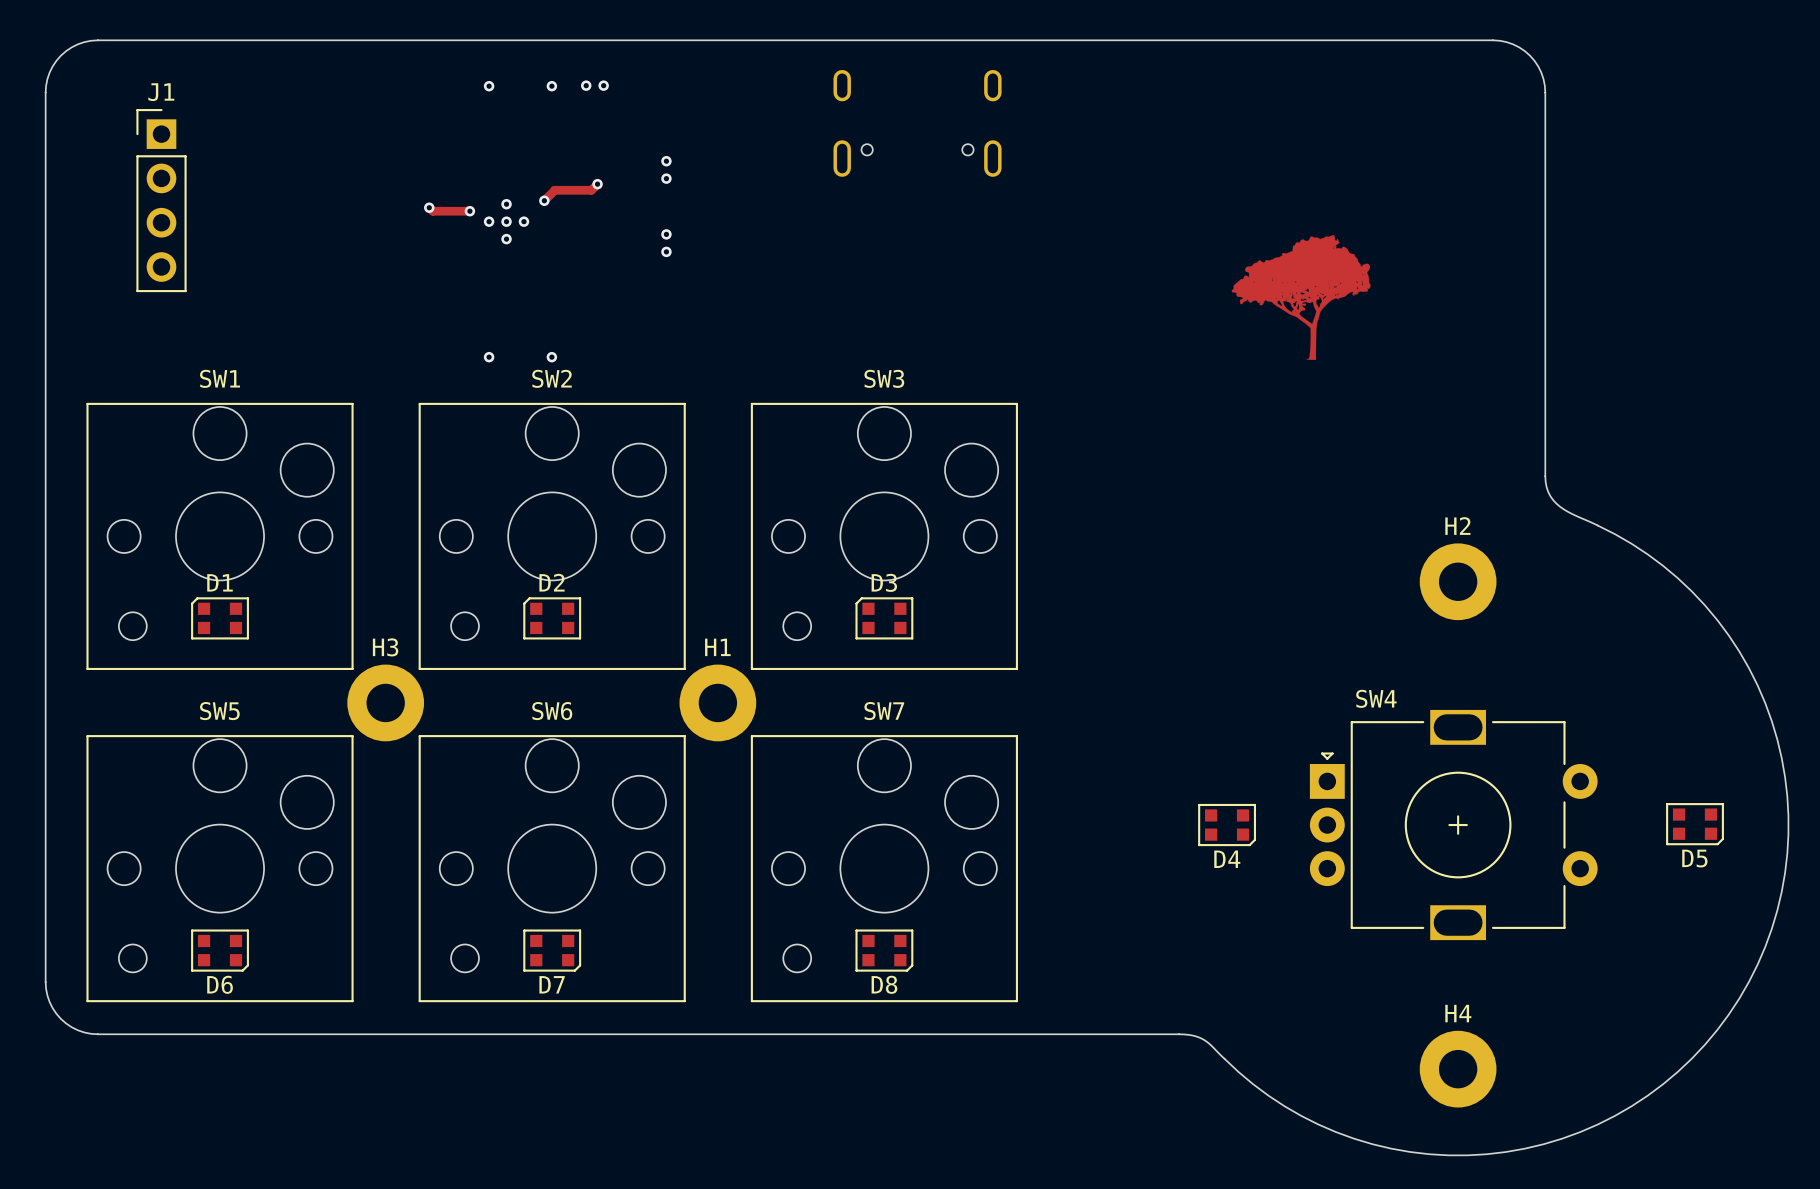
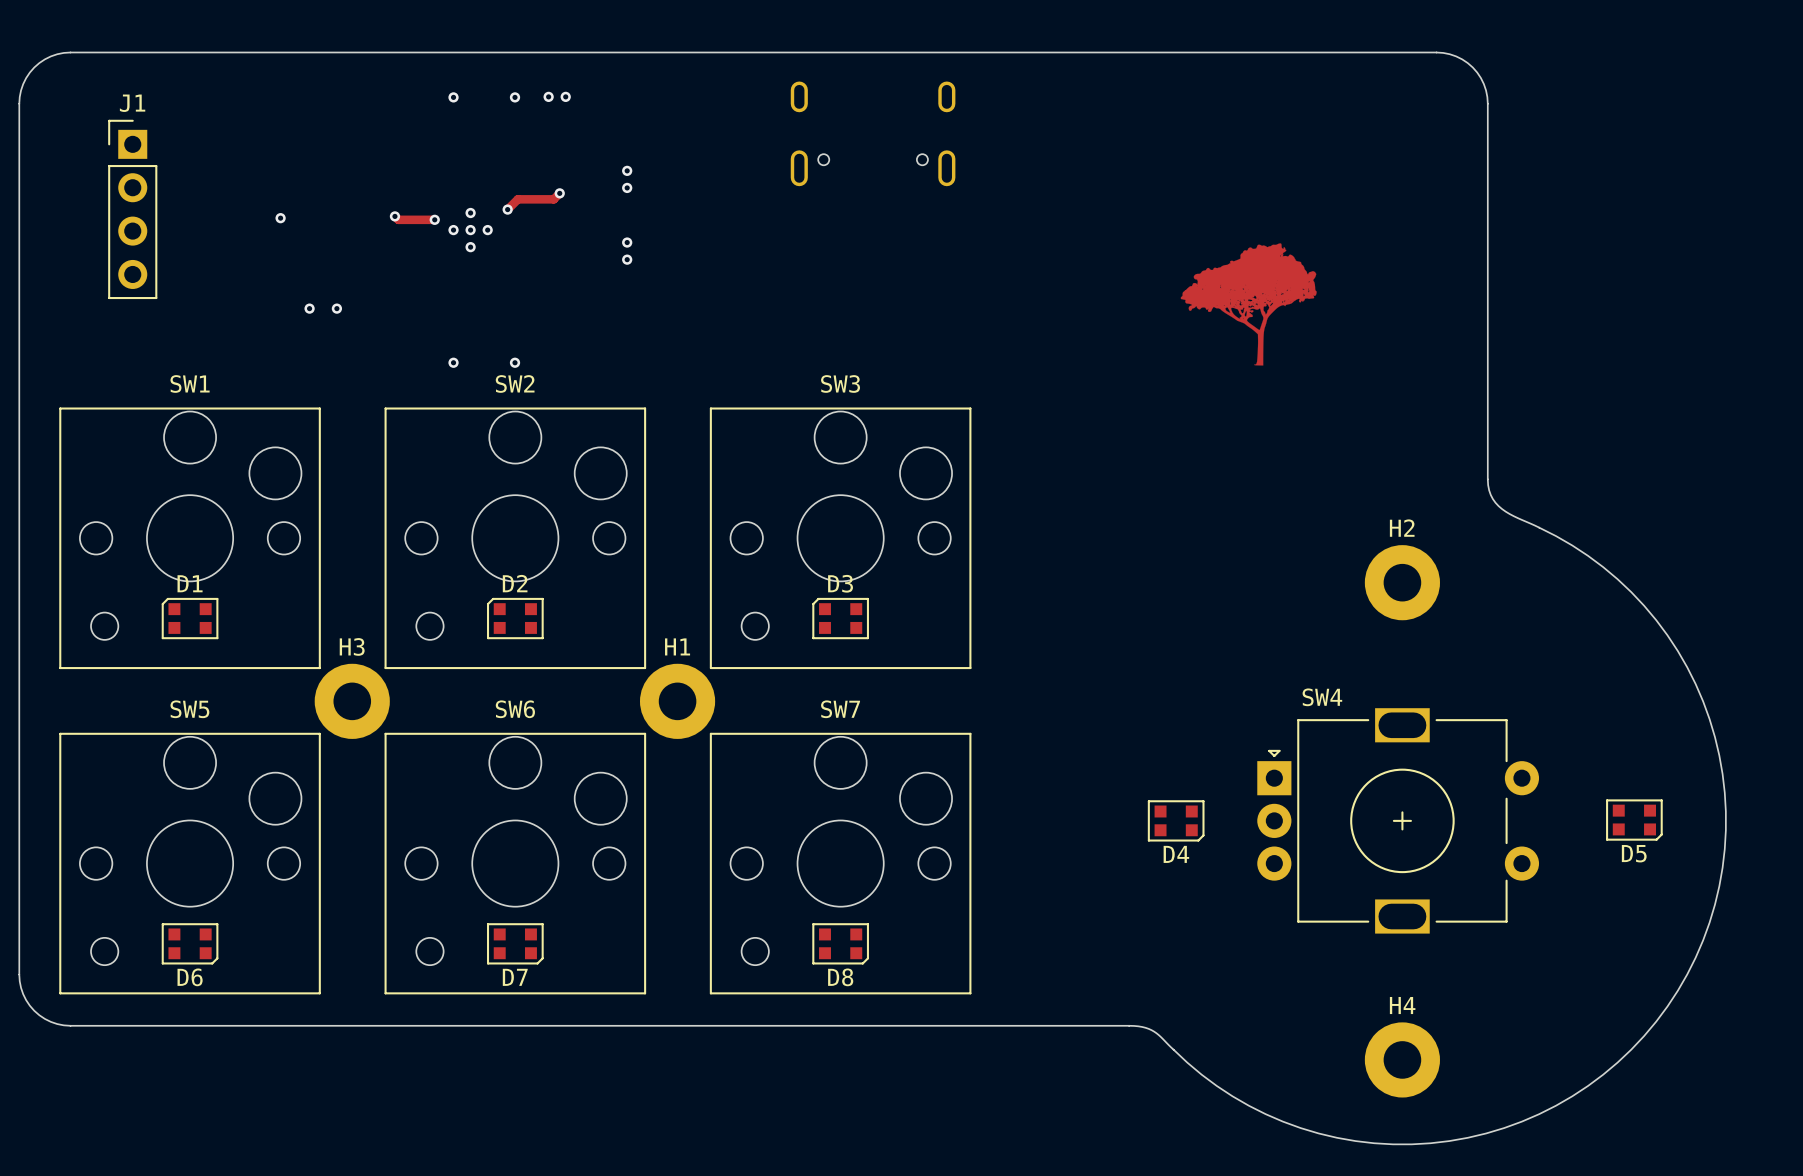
via: none -> (280, 218)
via: none -> (309, 308)
via: none -> (336, 308)

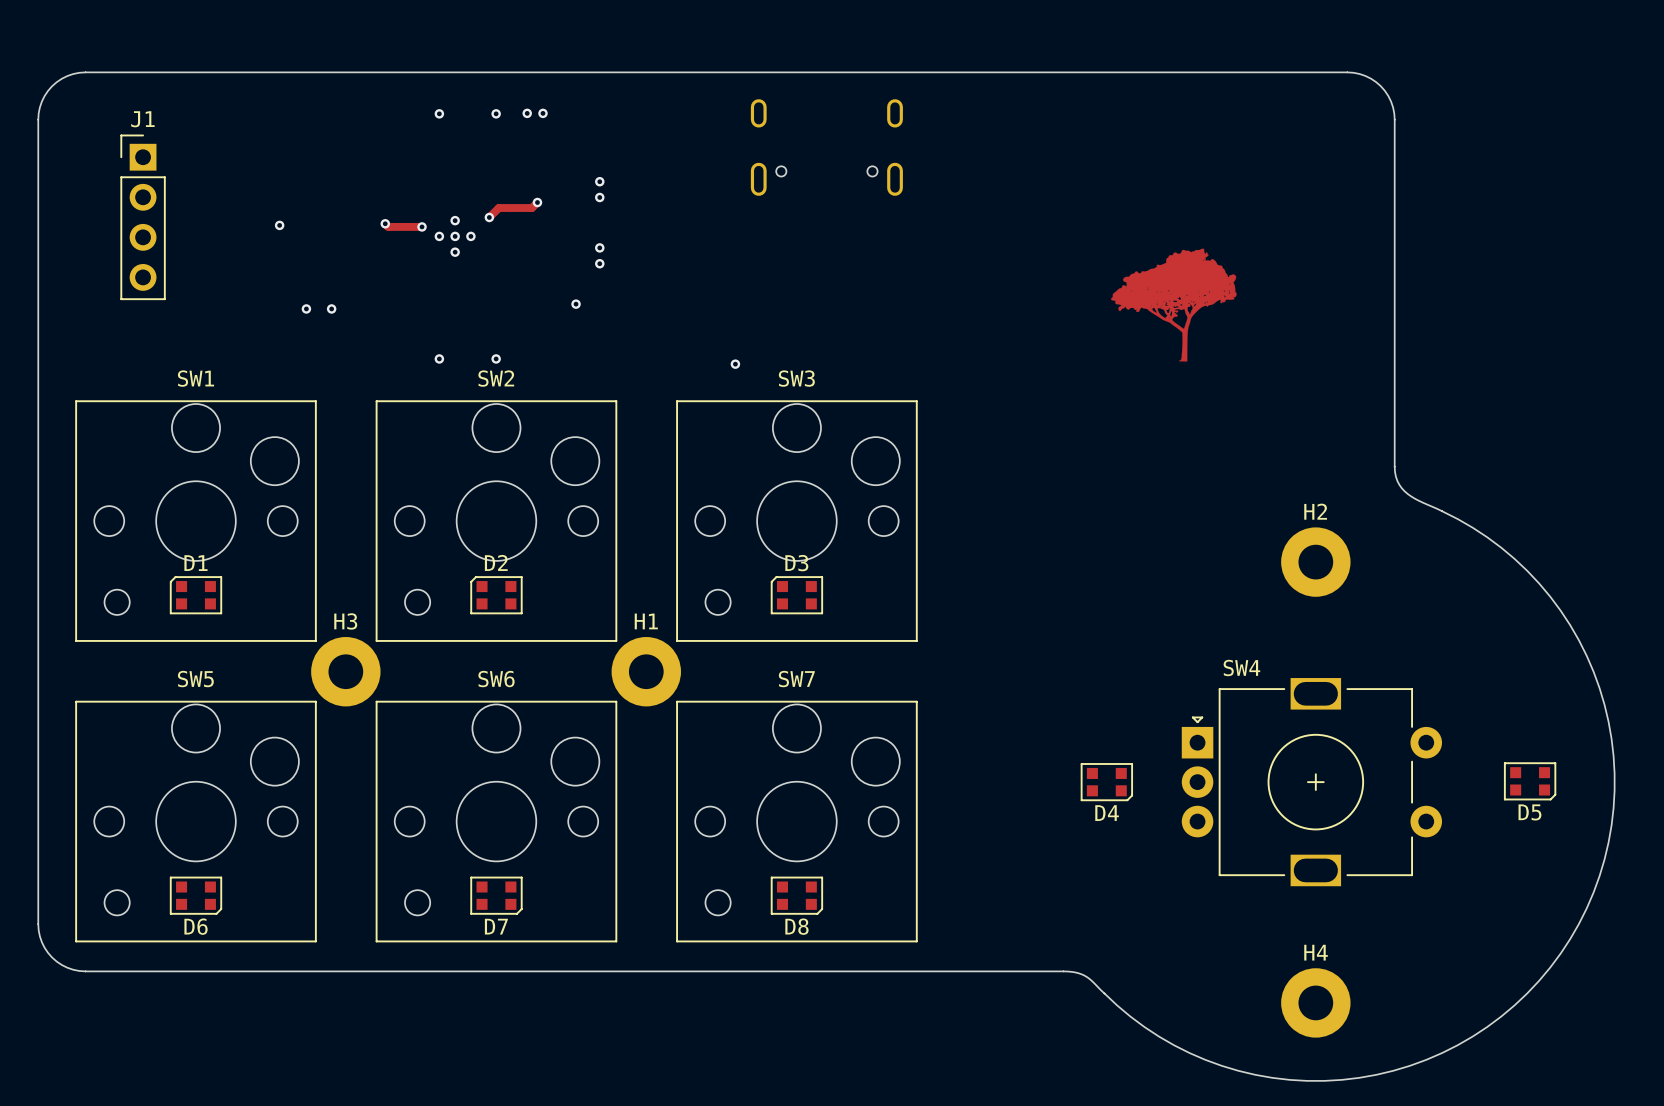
via: none -> (576, 304)
via: none -> (735, 364)

